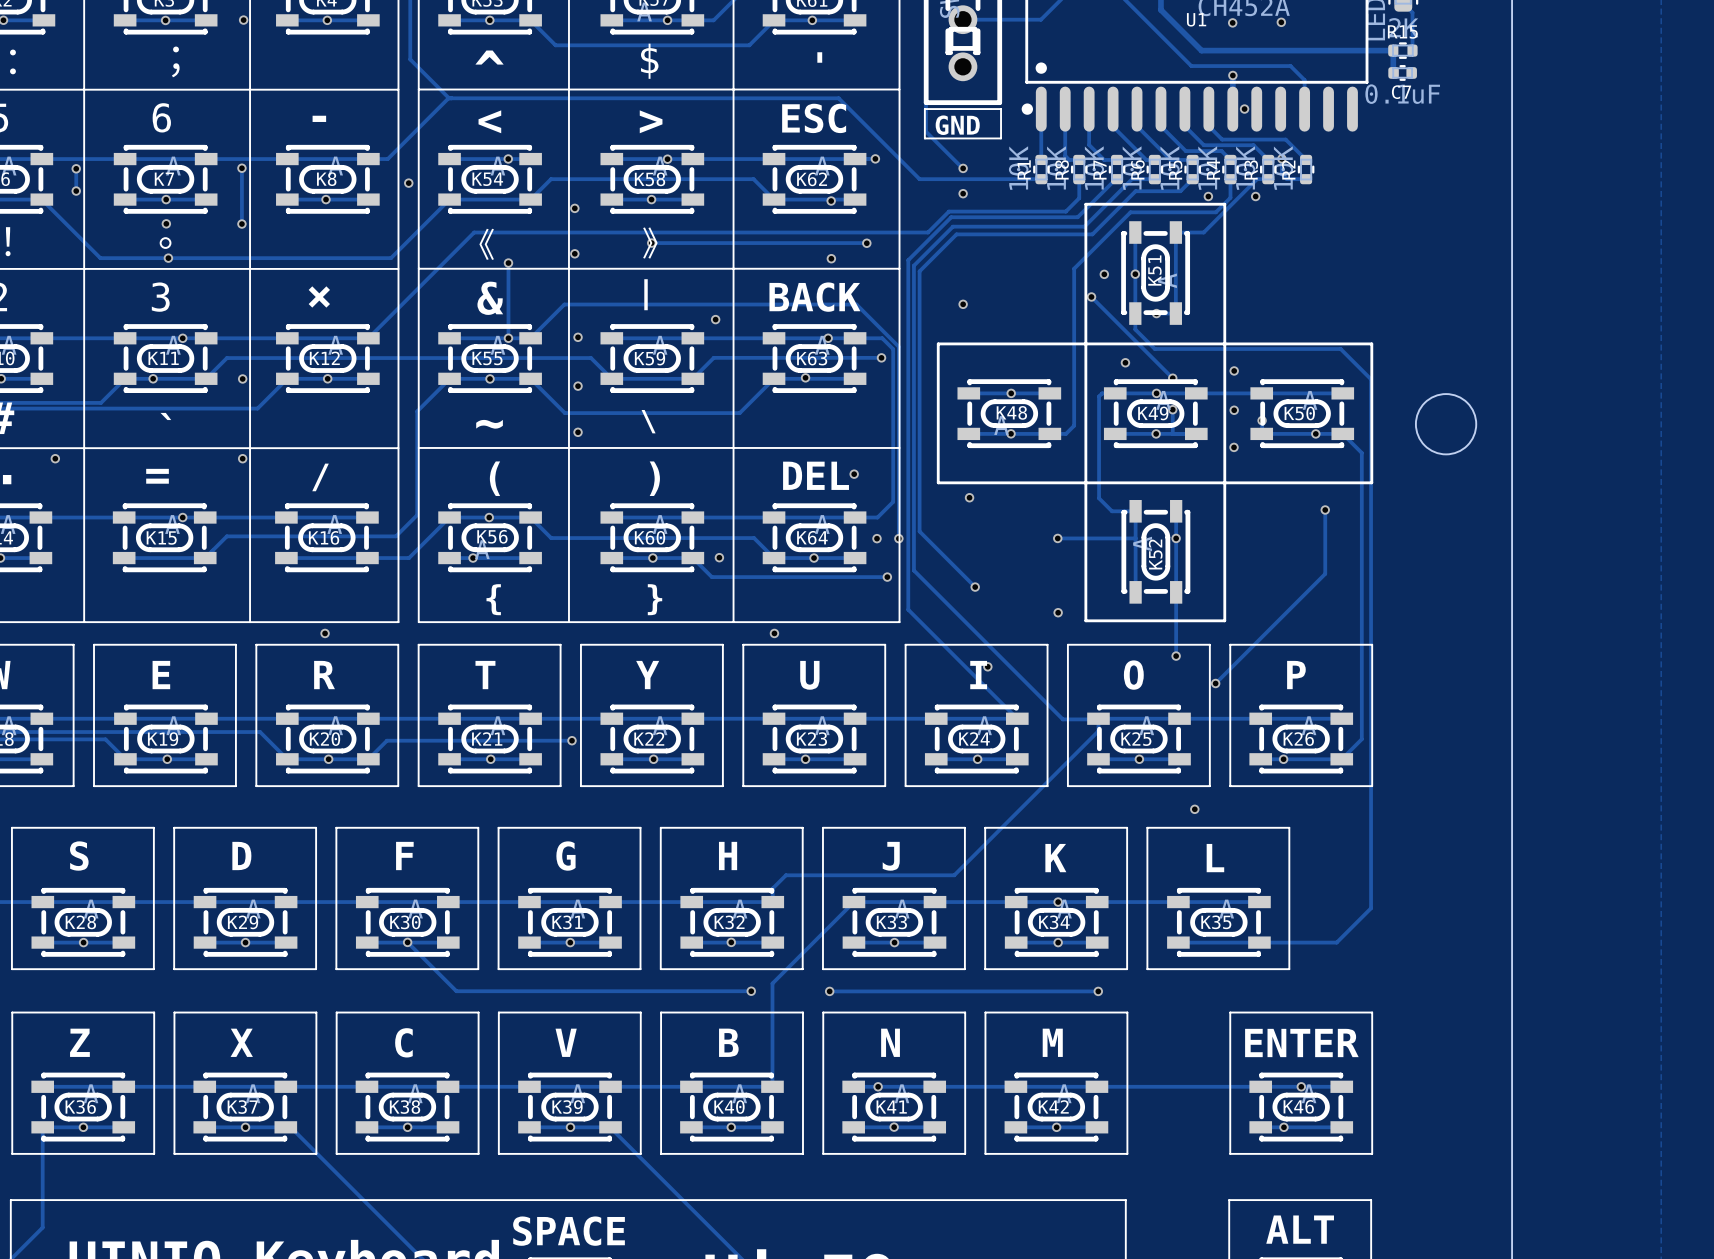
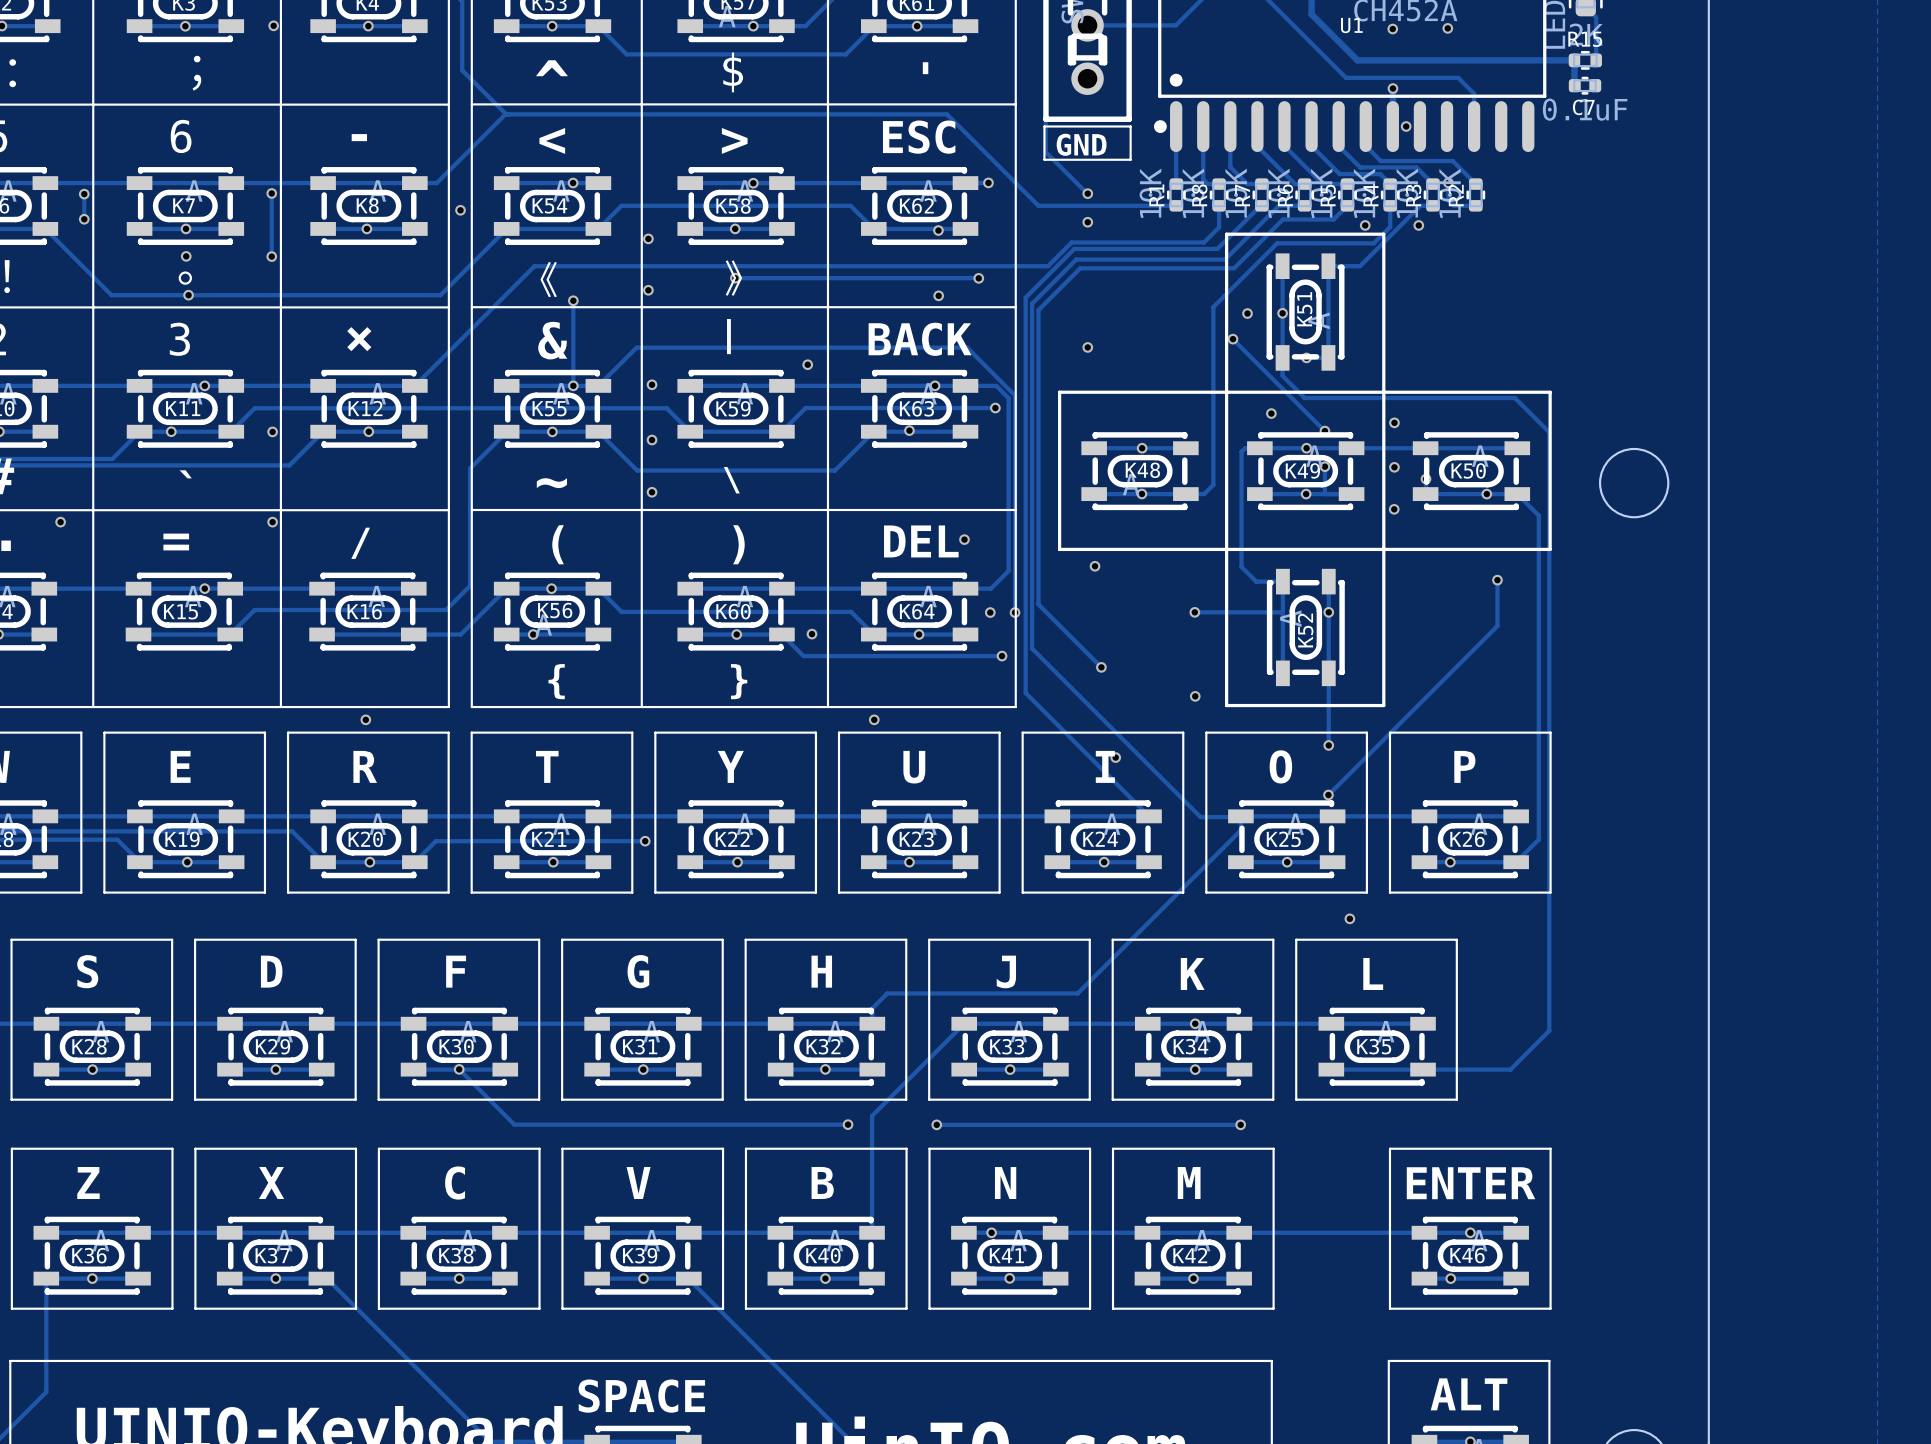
track: (1325, 550) (1325, 573) (1215, 683) -> (1497, 625) (1328, 795)
via position: (1215, 683) -> (1328, 795)

